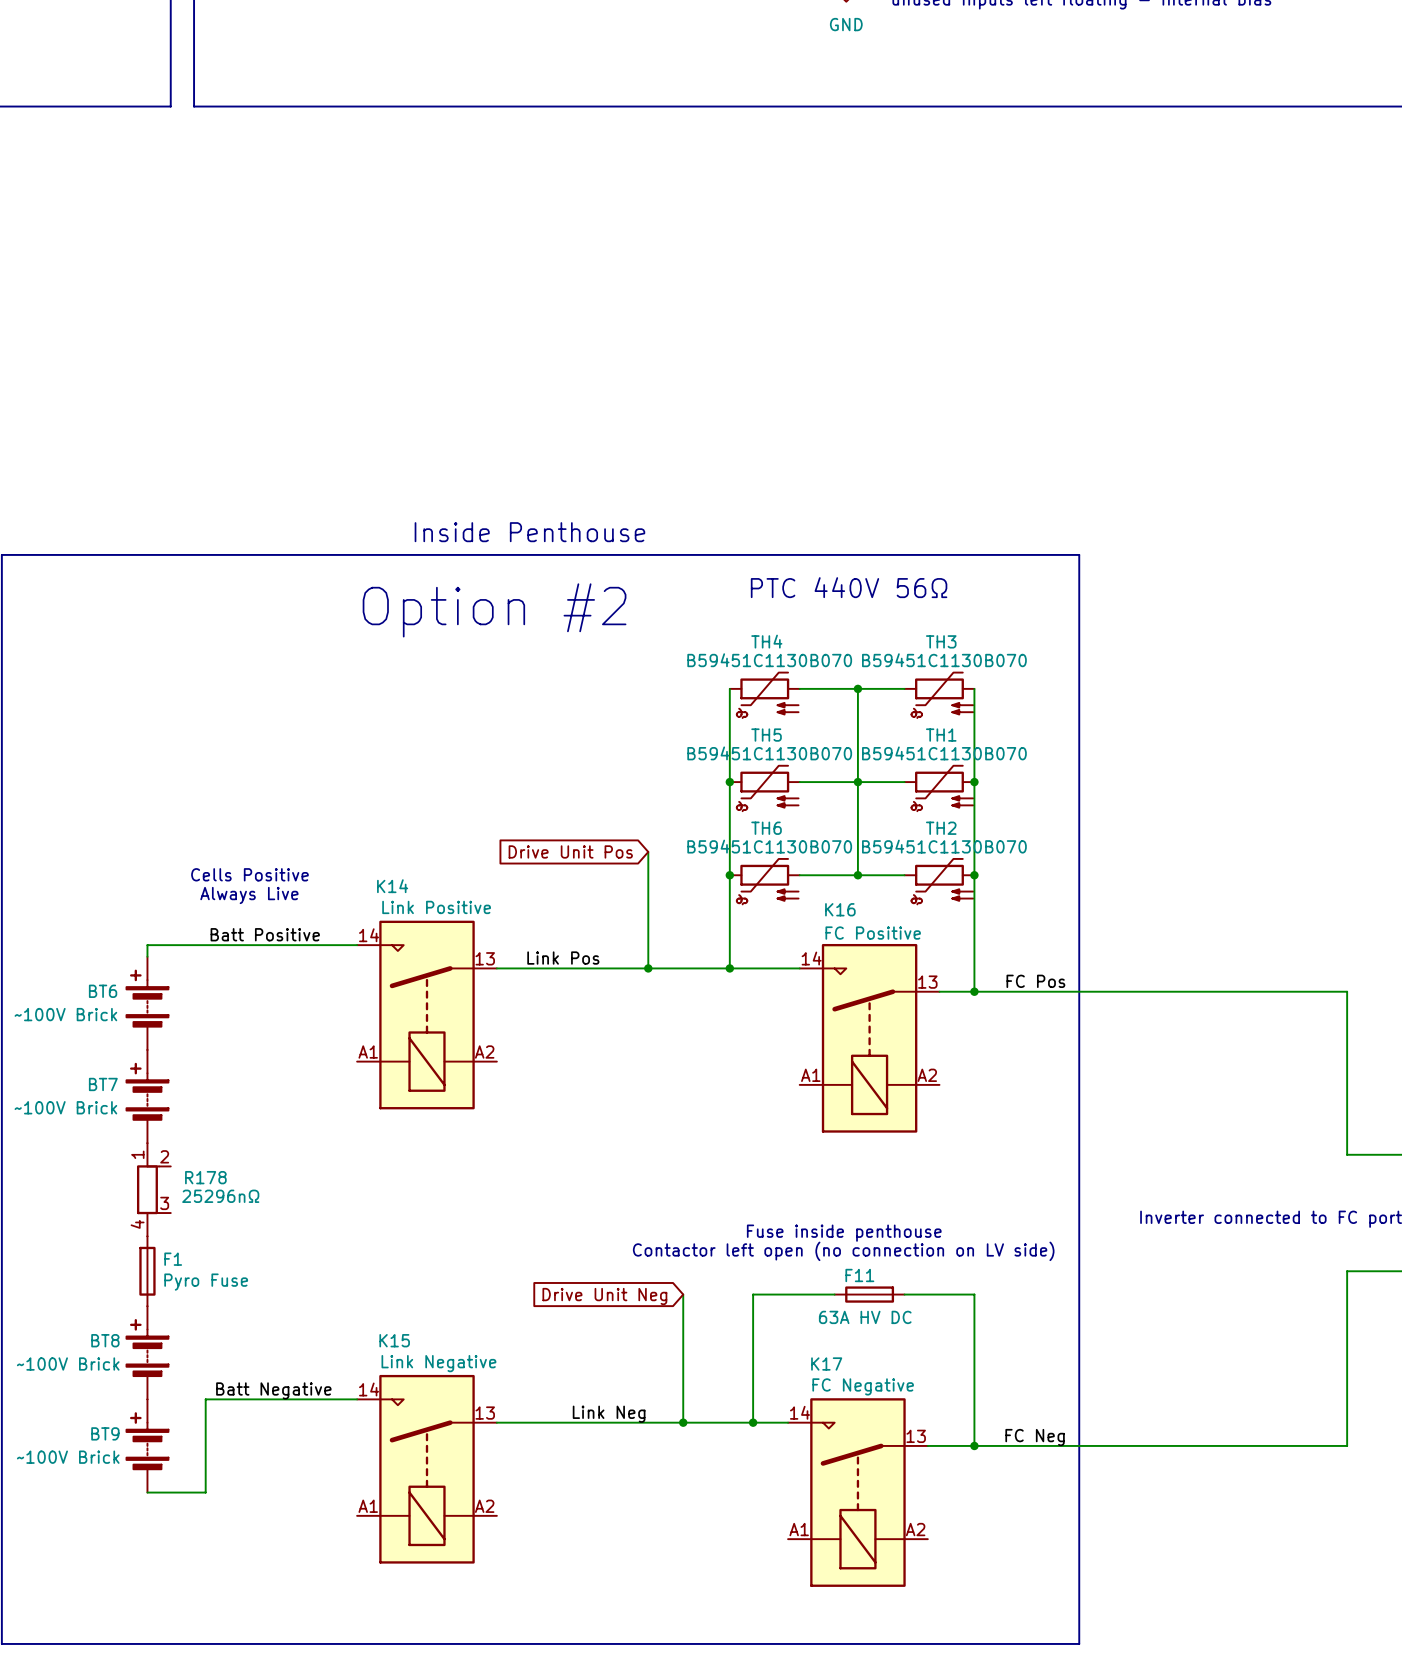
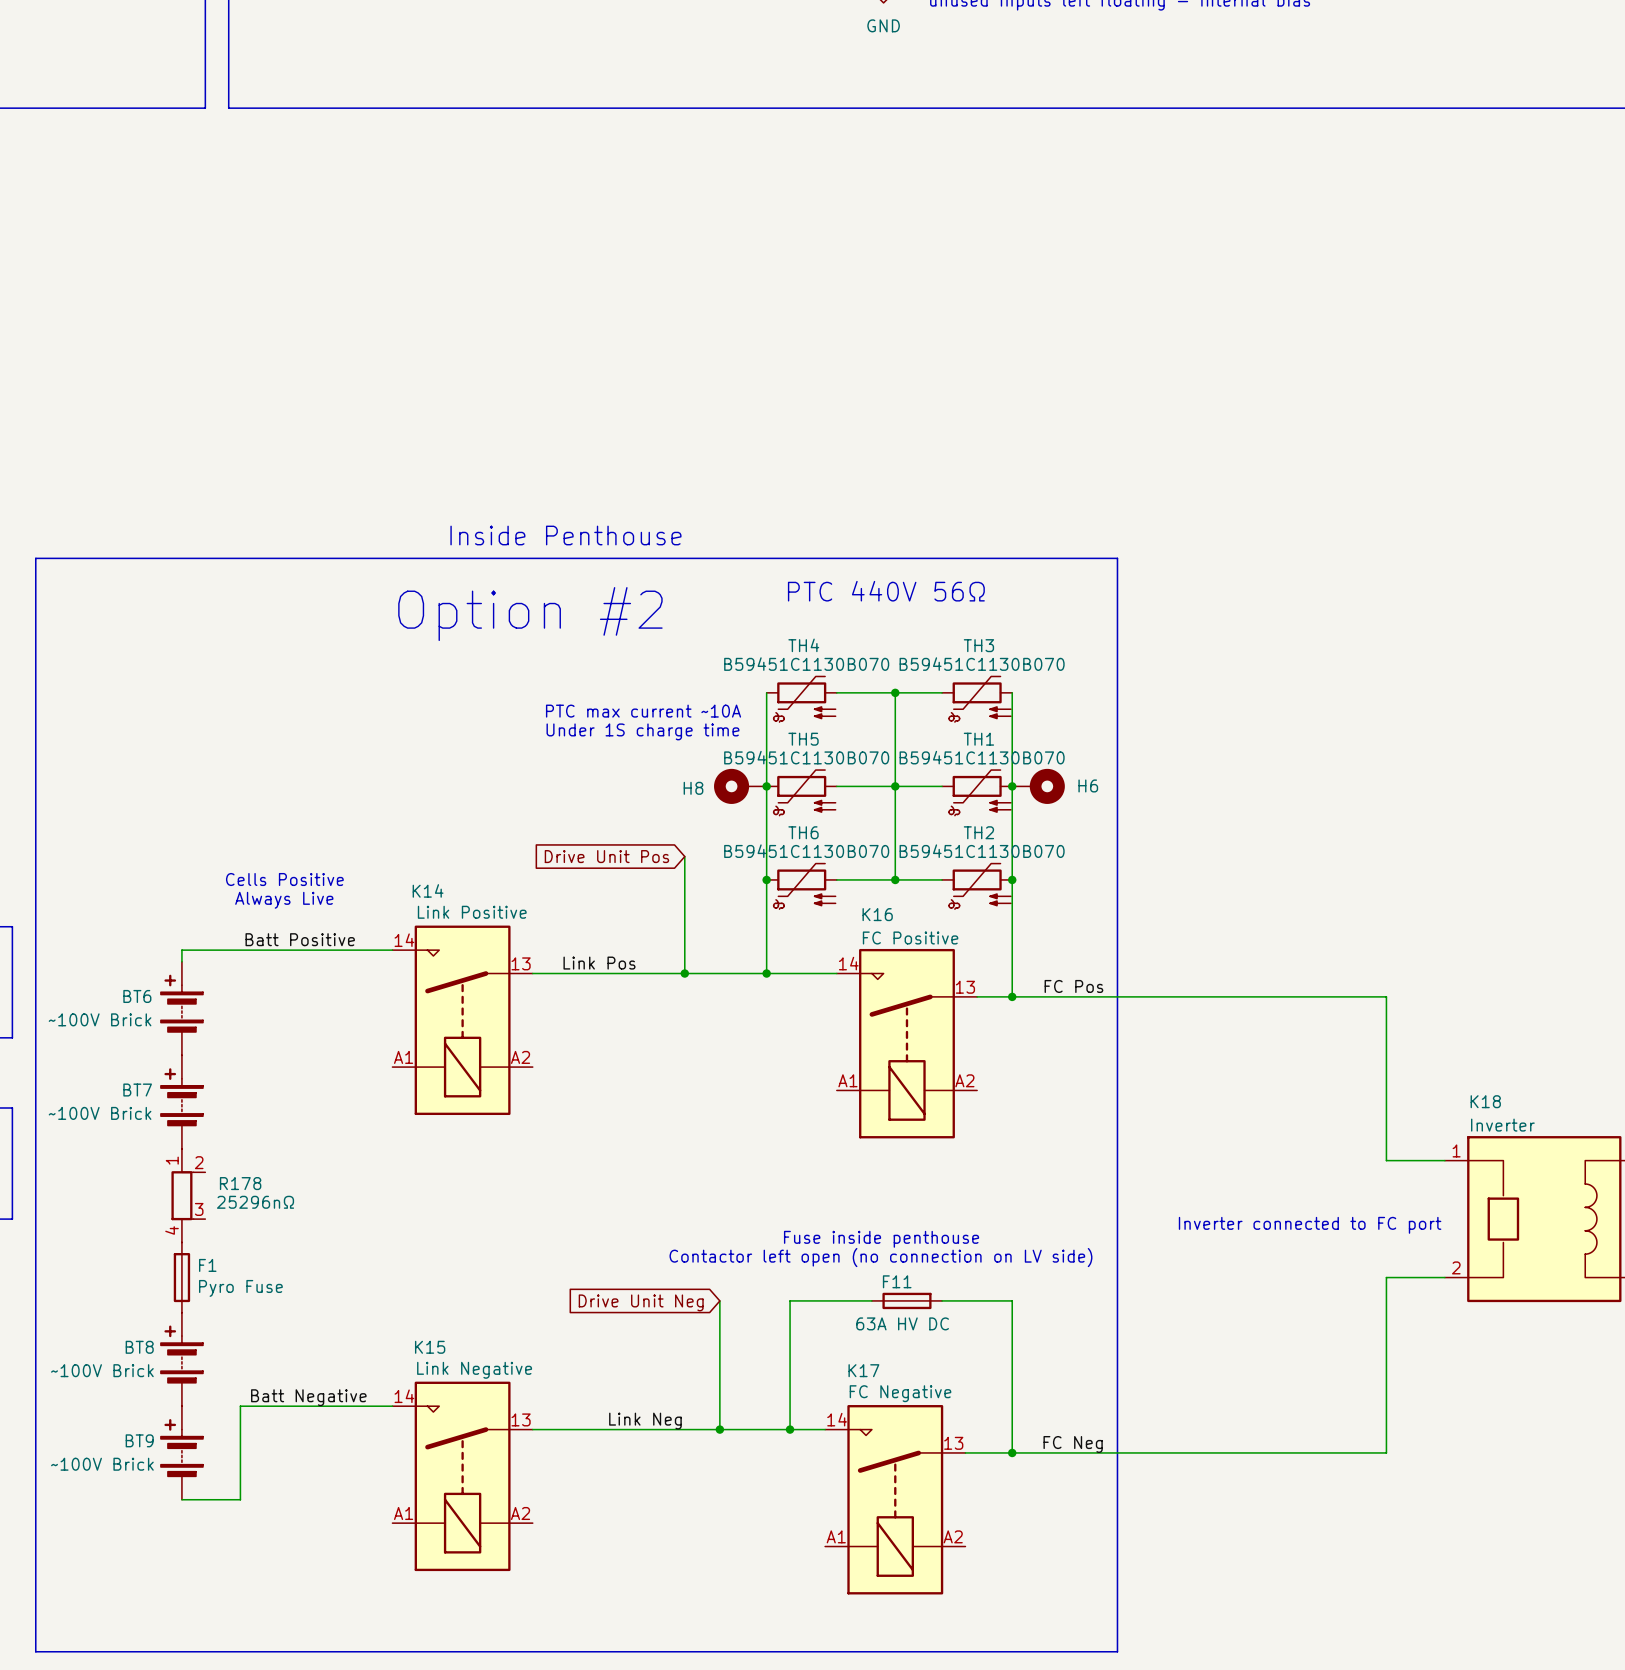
text: none -> PTC max current ~10A (643, 711)
text: none -> Under 1S charge time (642, 731)
H8: none -> (740, 786)
H6: none -> (1038, 786)

